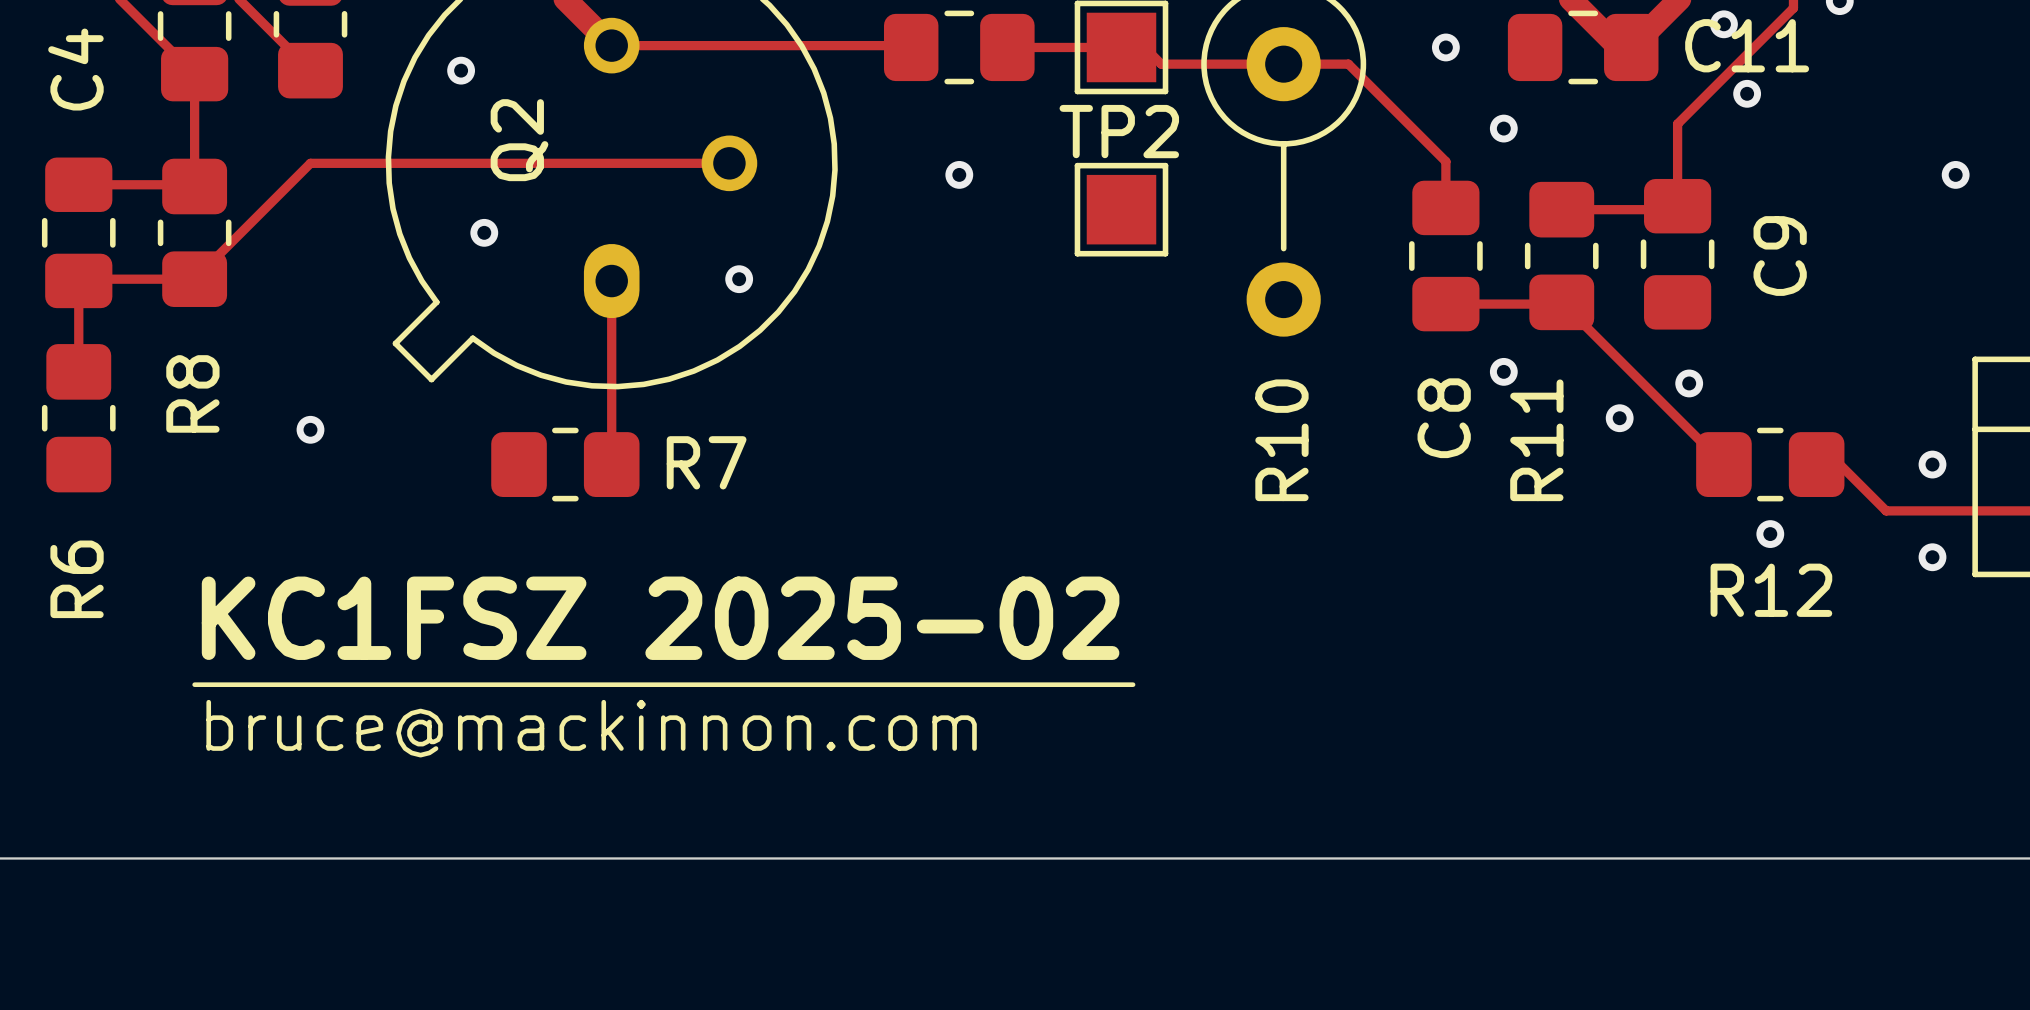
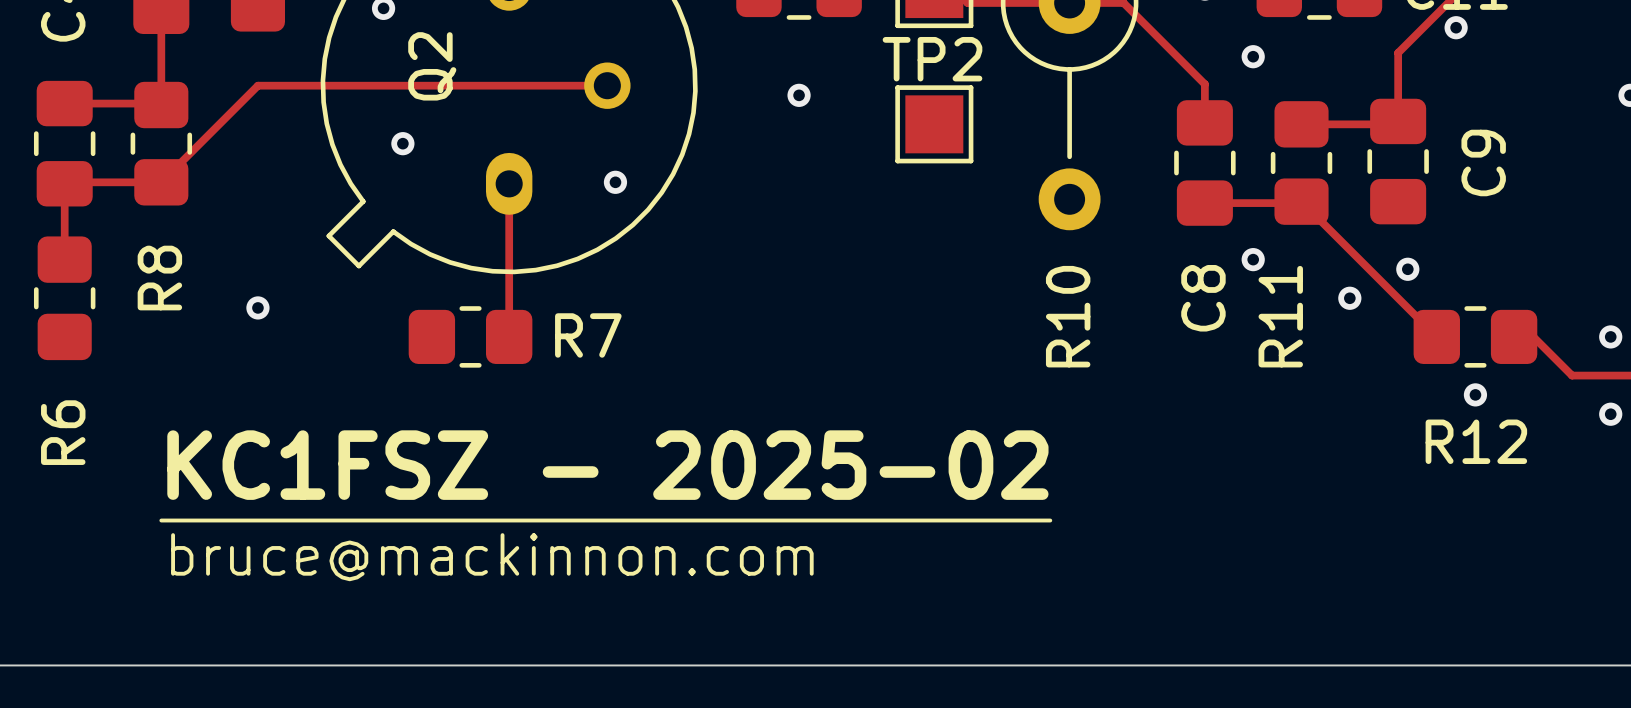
text: KC1FSZ 2025-02 (660, 618) -> KC1FSZ - 2025-02 (607, 465)
line: none -> (944, 520) (1050, 520)

